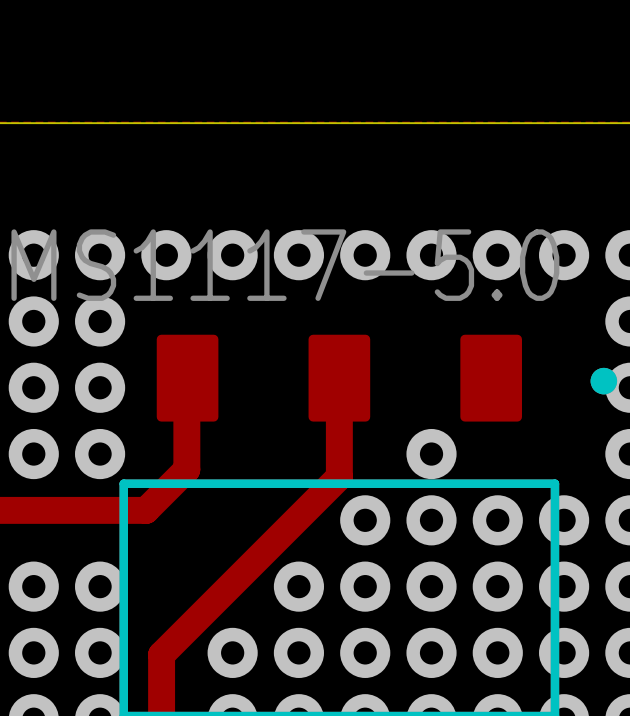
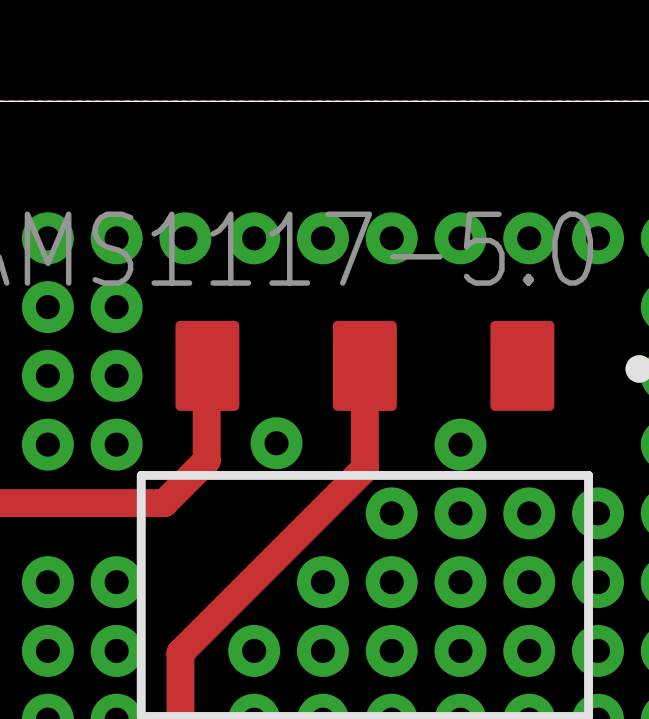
via: none -> (276, 443)

